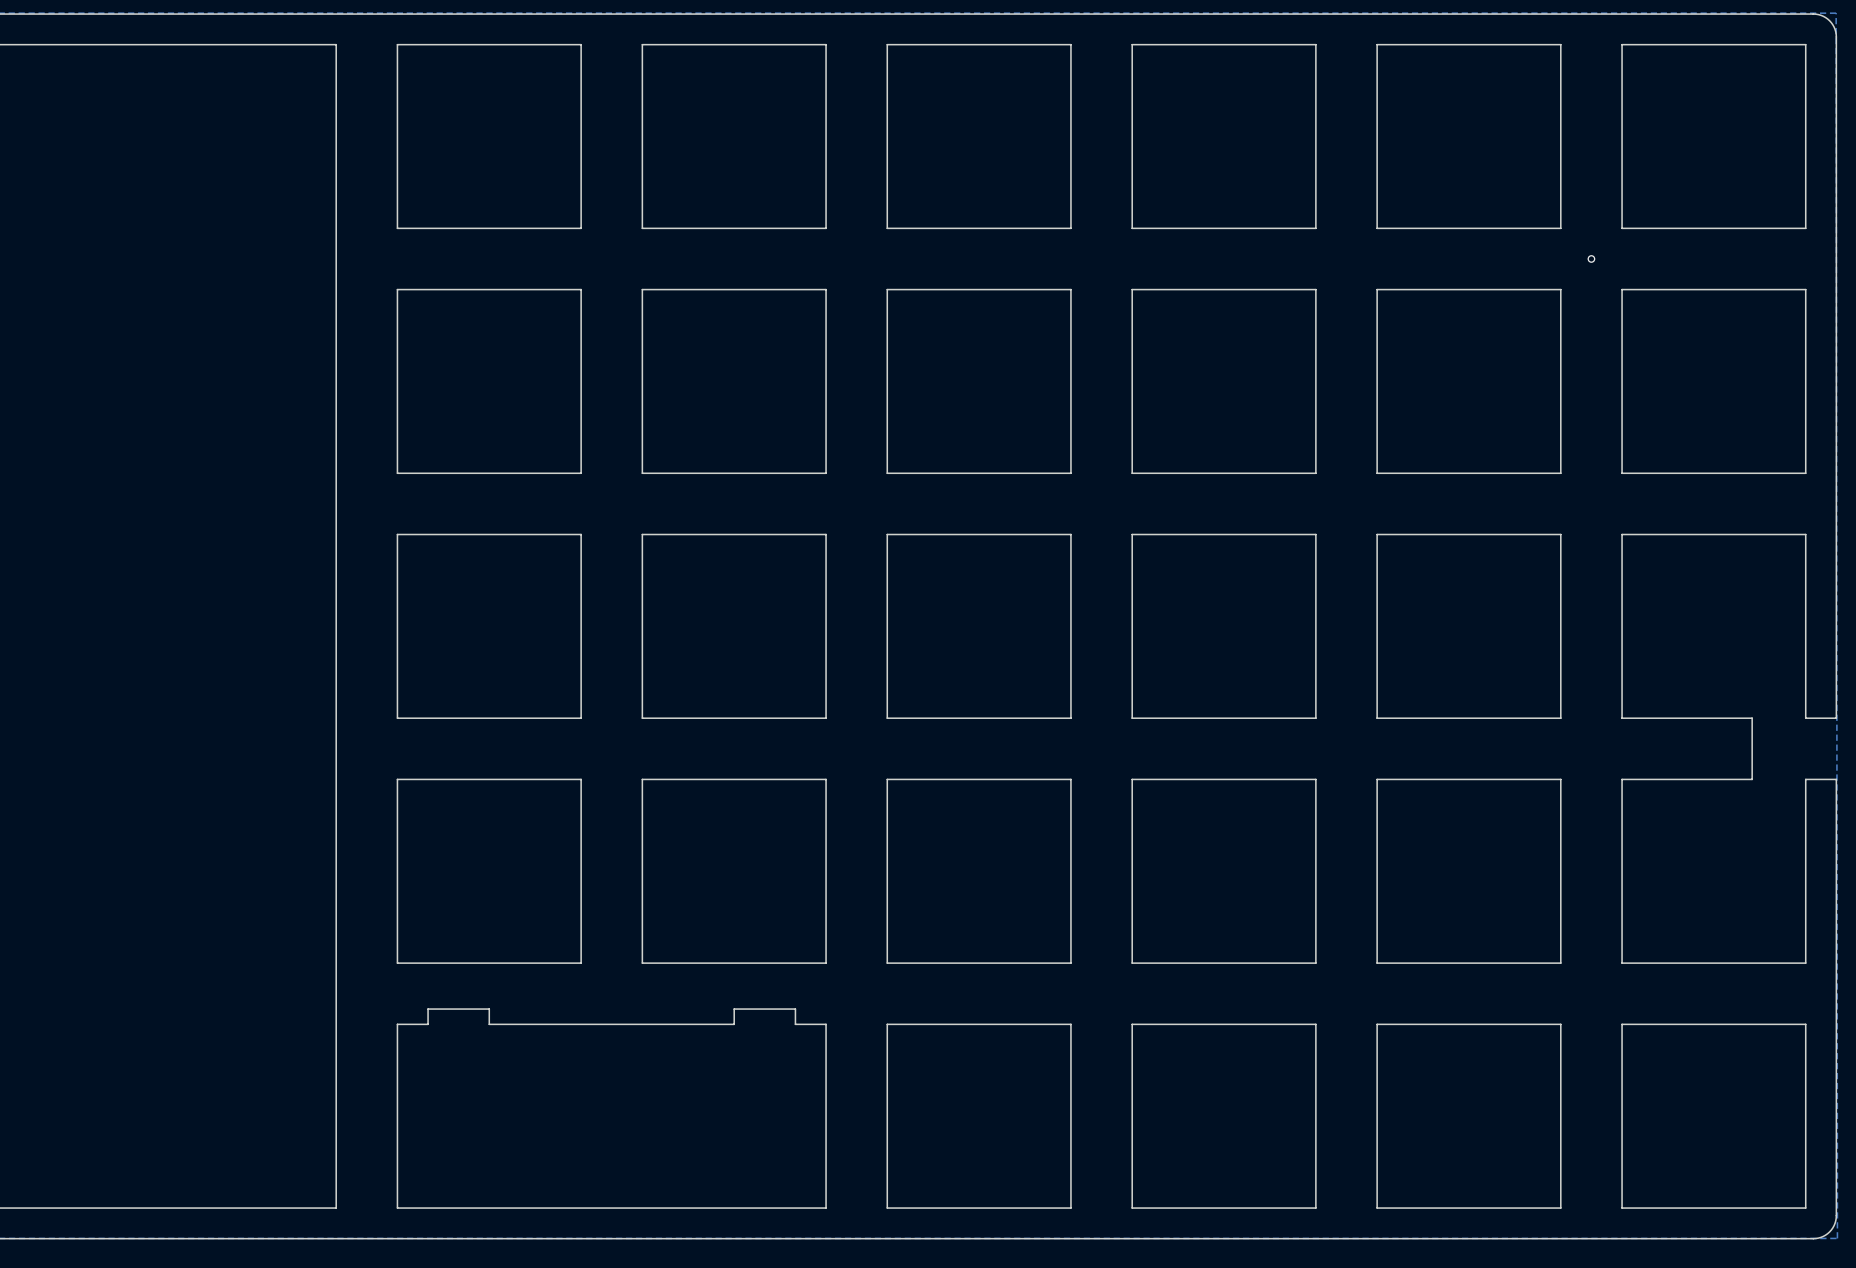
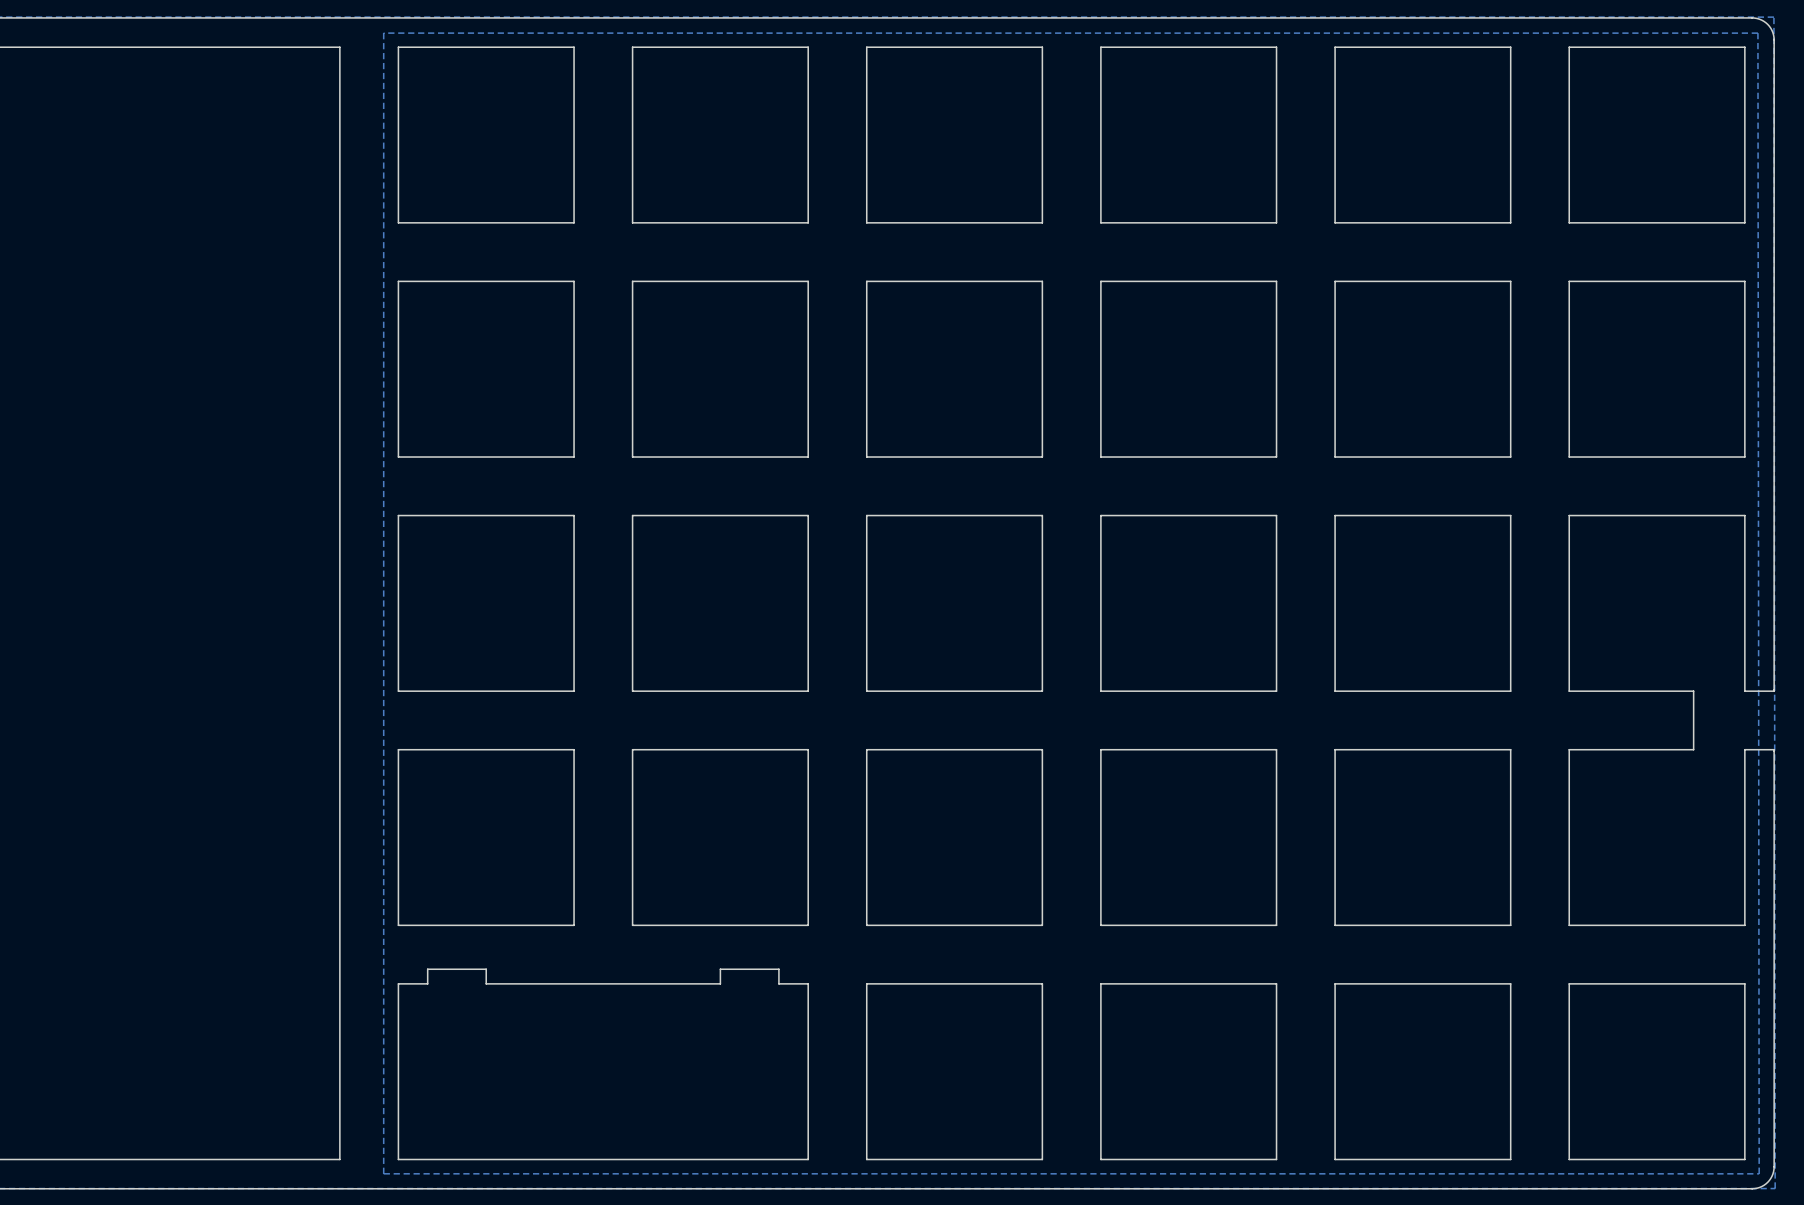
zone outline: none -> (1757, 33) (1759, 1173) (383, 1173) (383, 33) (1757, 33)
via: (1591, 258) -> none

